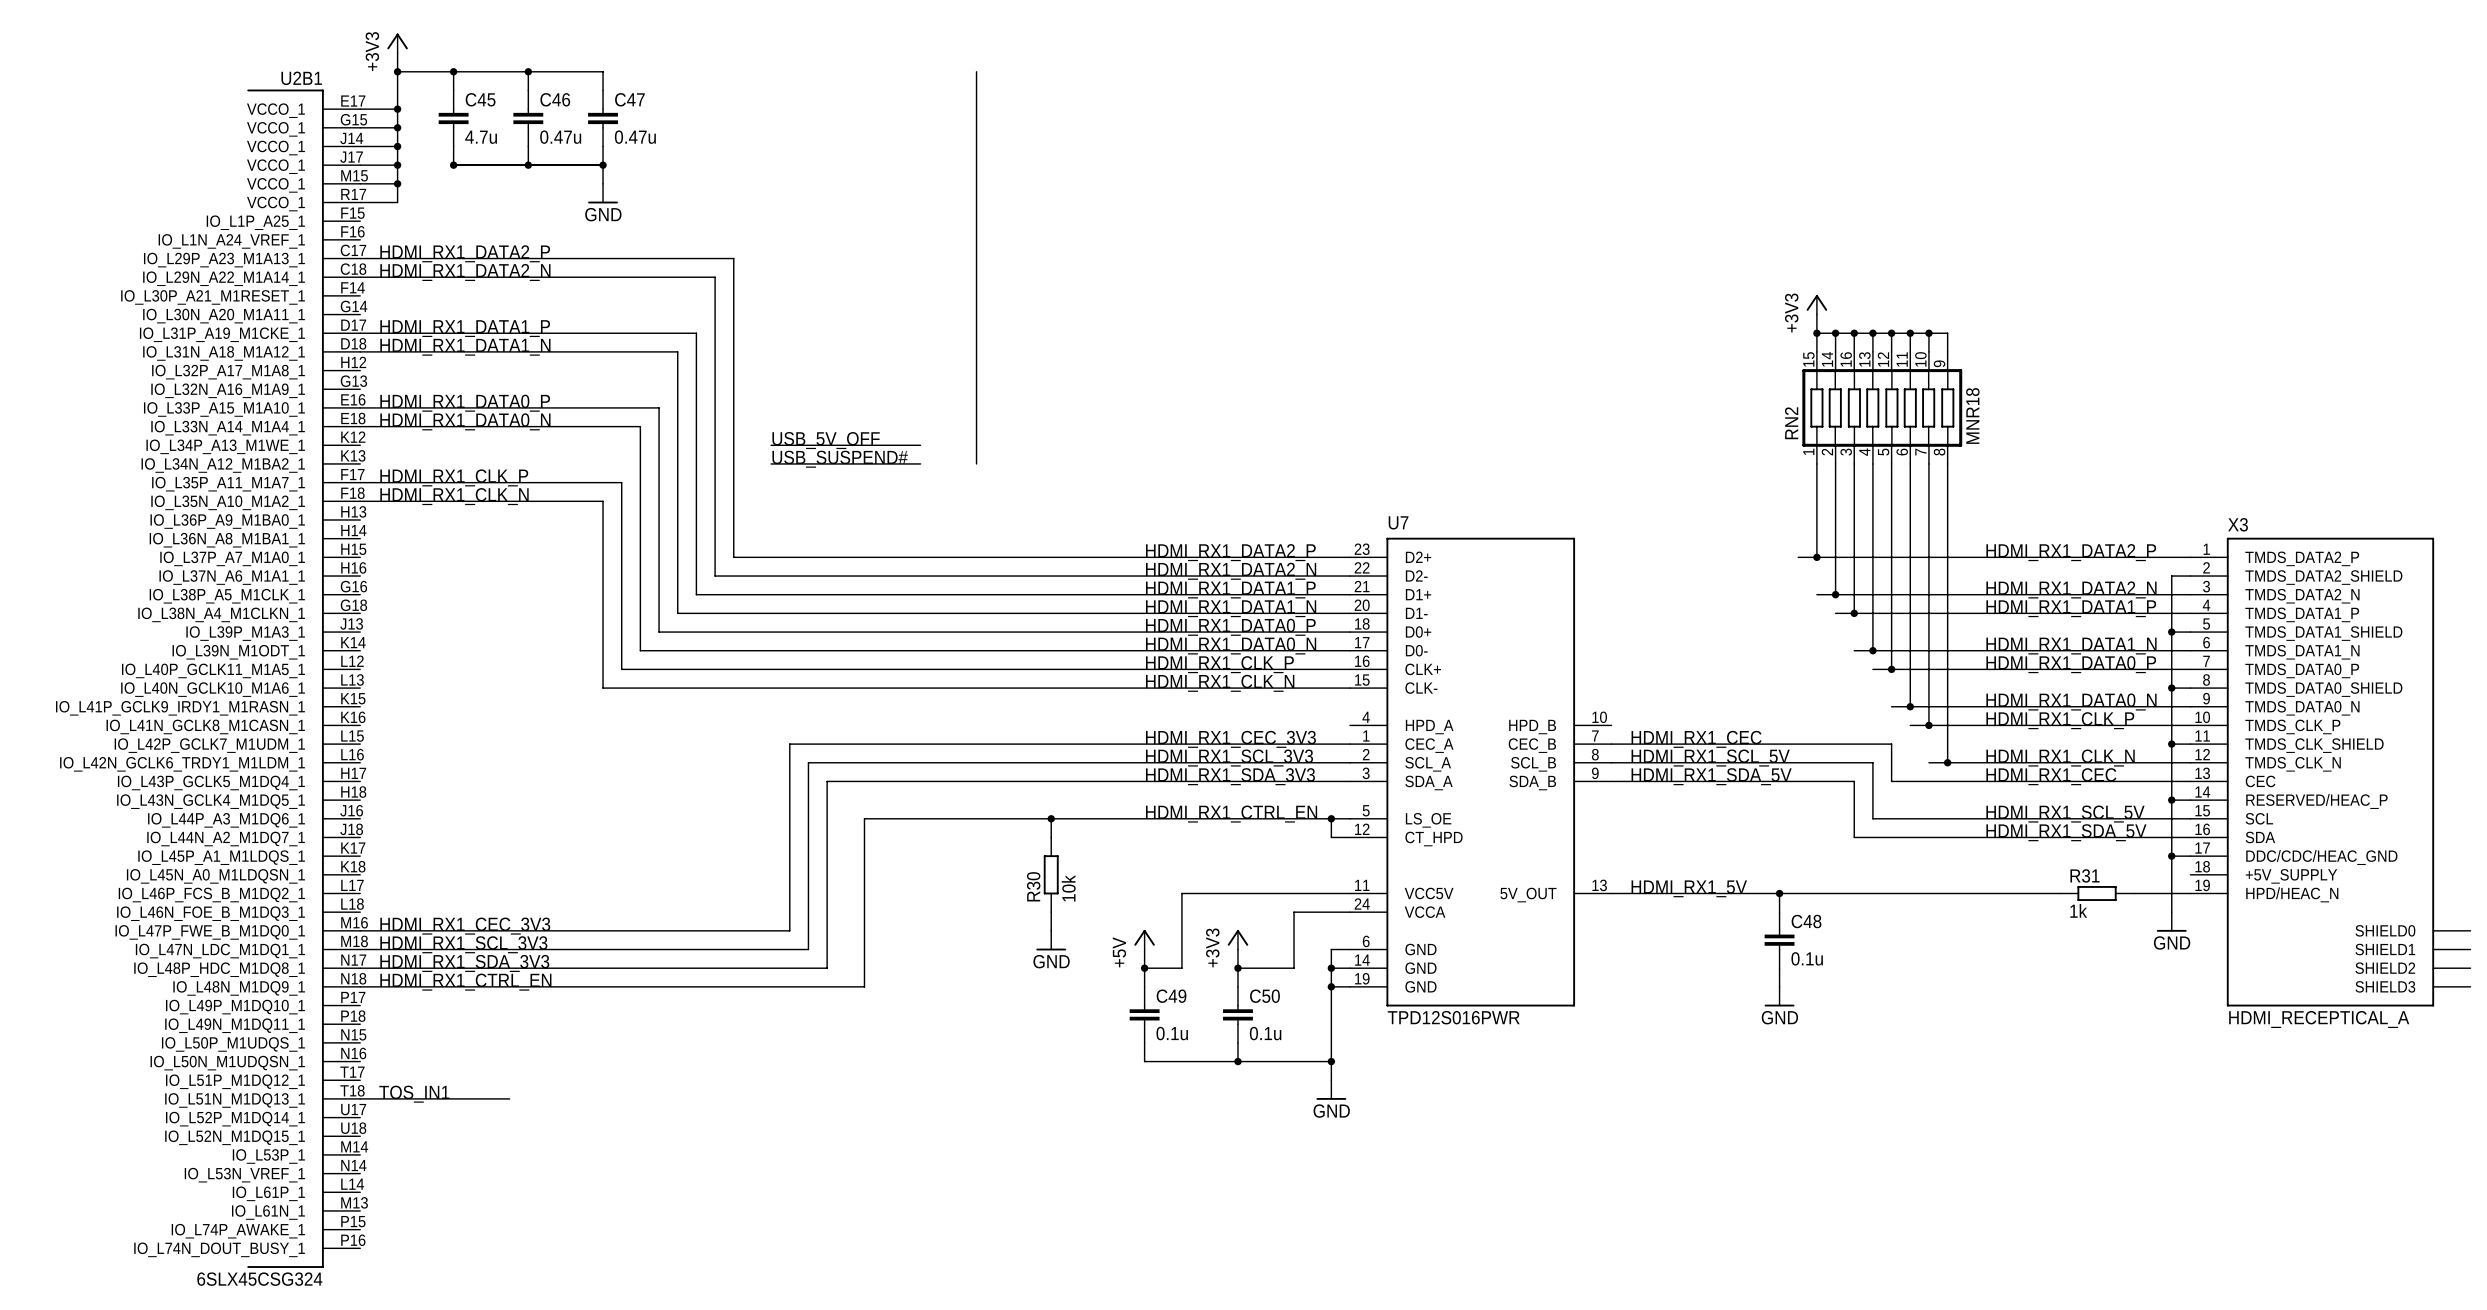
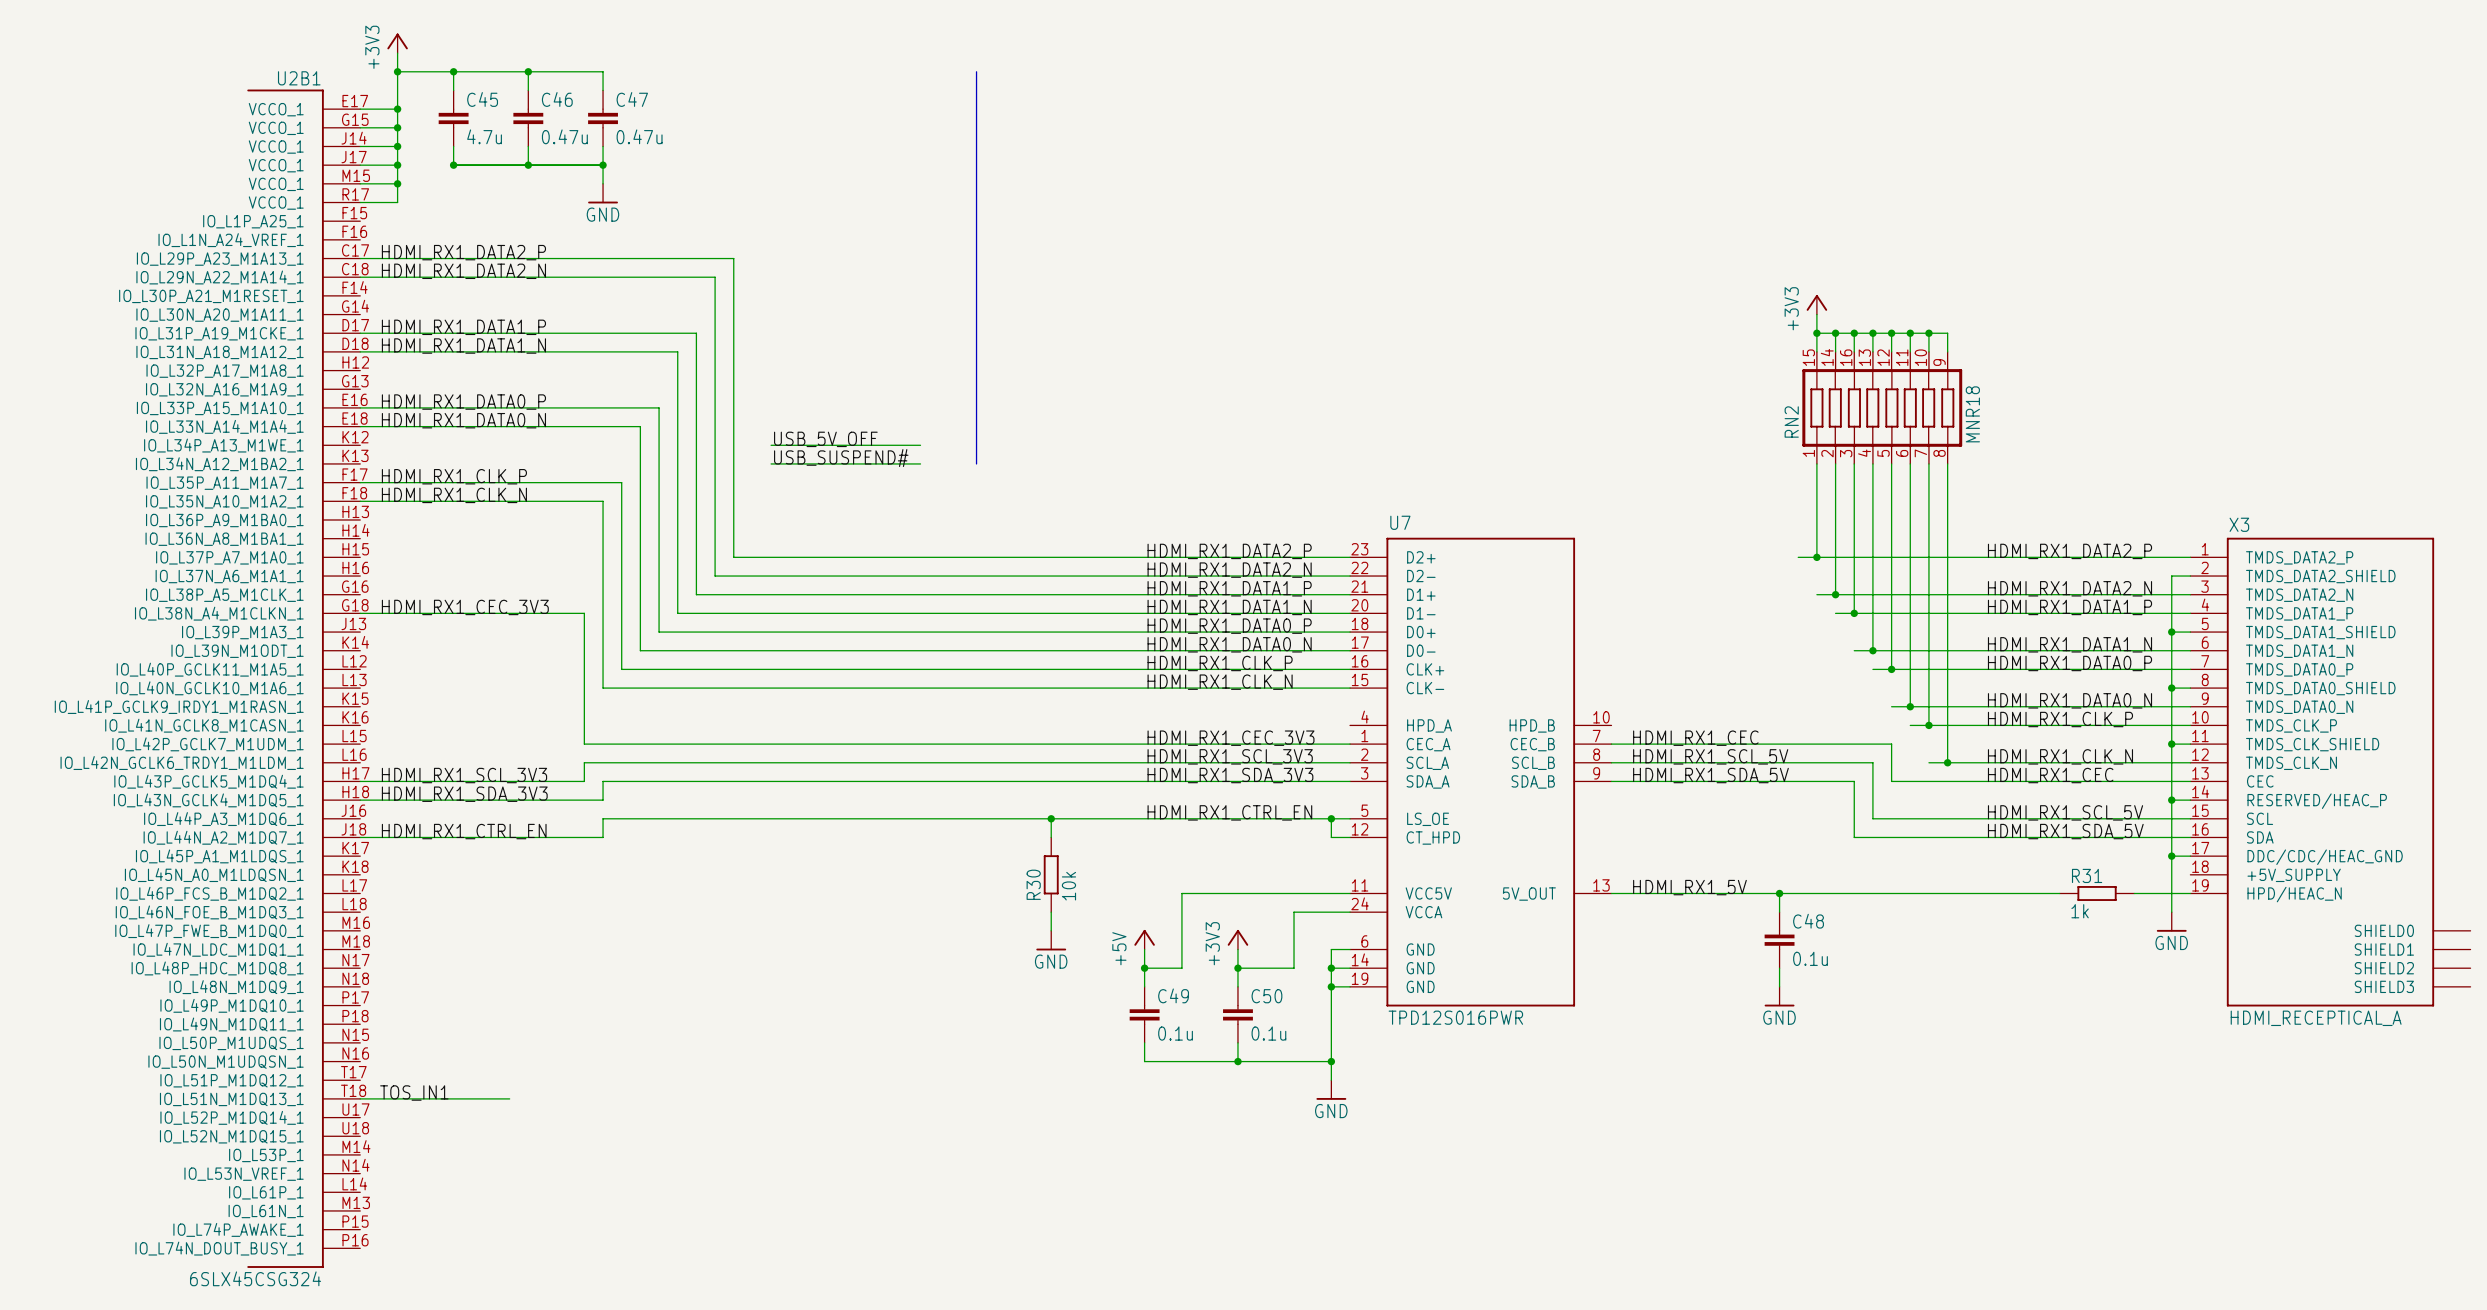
label: none -> HDMI_RX1_CEC_3V3 (465, 607)
wire: (789, 744) (789, 930) (360, 930) -> (789, 744) (584, 744) (584, 613) (360, 613)
wire: (808, 762) (808, 949) (360, 949) -> (808, 762) (584, 762) (584, 781) (360, 781)
wire: (827, 781) (827, 968) (360, 968) -> (827, 781) (603, 781) (603, 800) (360, 800)
wire: (864, 818) (864, 986) (360, 986) -> (864, 818) (603, 818) (603, 837) (360, 837)
label: HDMI_RX1_CEC_3V3 (465, 926) -> none
label position: HDMI_RX1_SCL_3V3 (463, 944) -> HDMI_RX1_SCL_3V3 (464, 775)
label position: HDMI_RX1_SDA_3V3 (464, 963) -> HDMI_RX1_SDA_3V3 (464, 794)
label position: HDMI_RX1_CTRL_EN (465, 982) -> HDMI_RX1_CTRL_EN (464, 831)

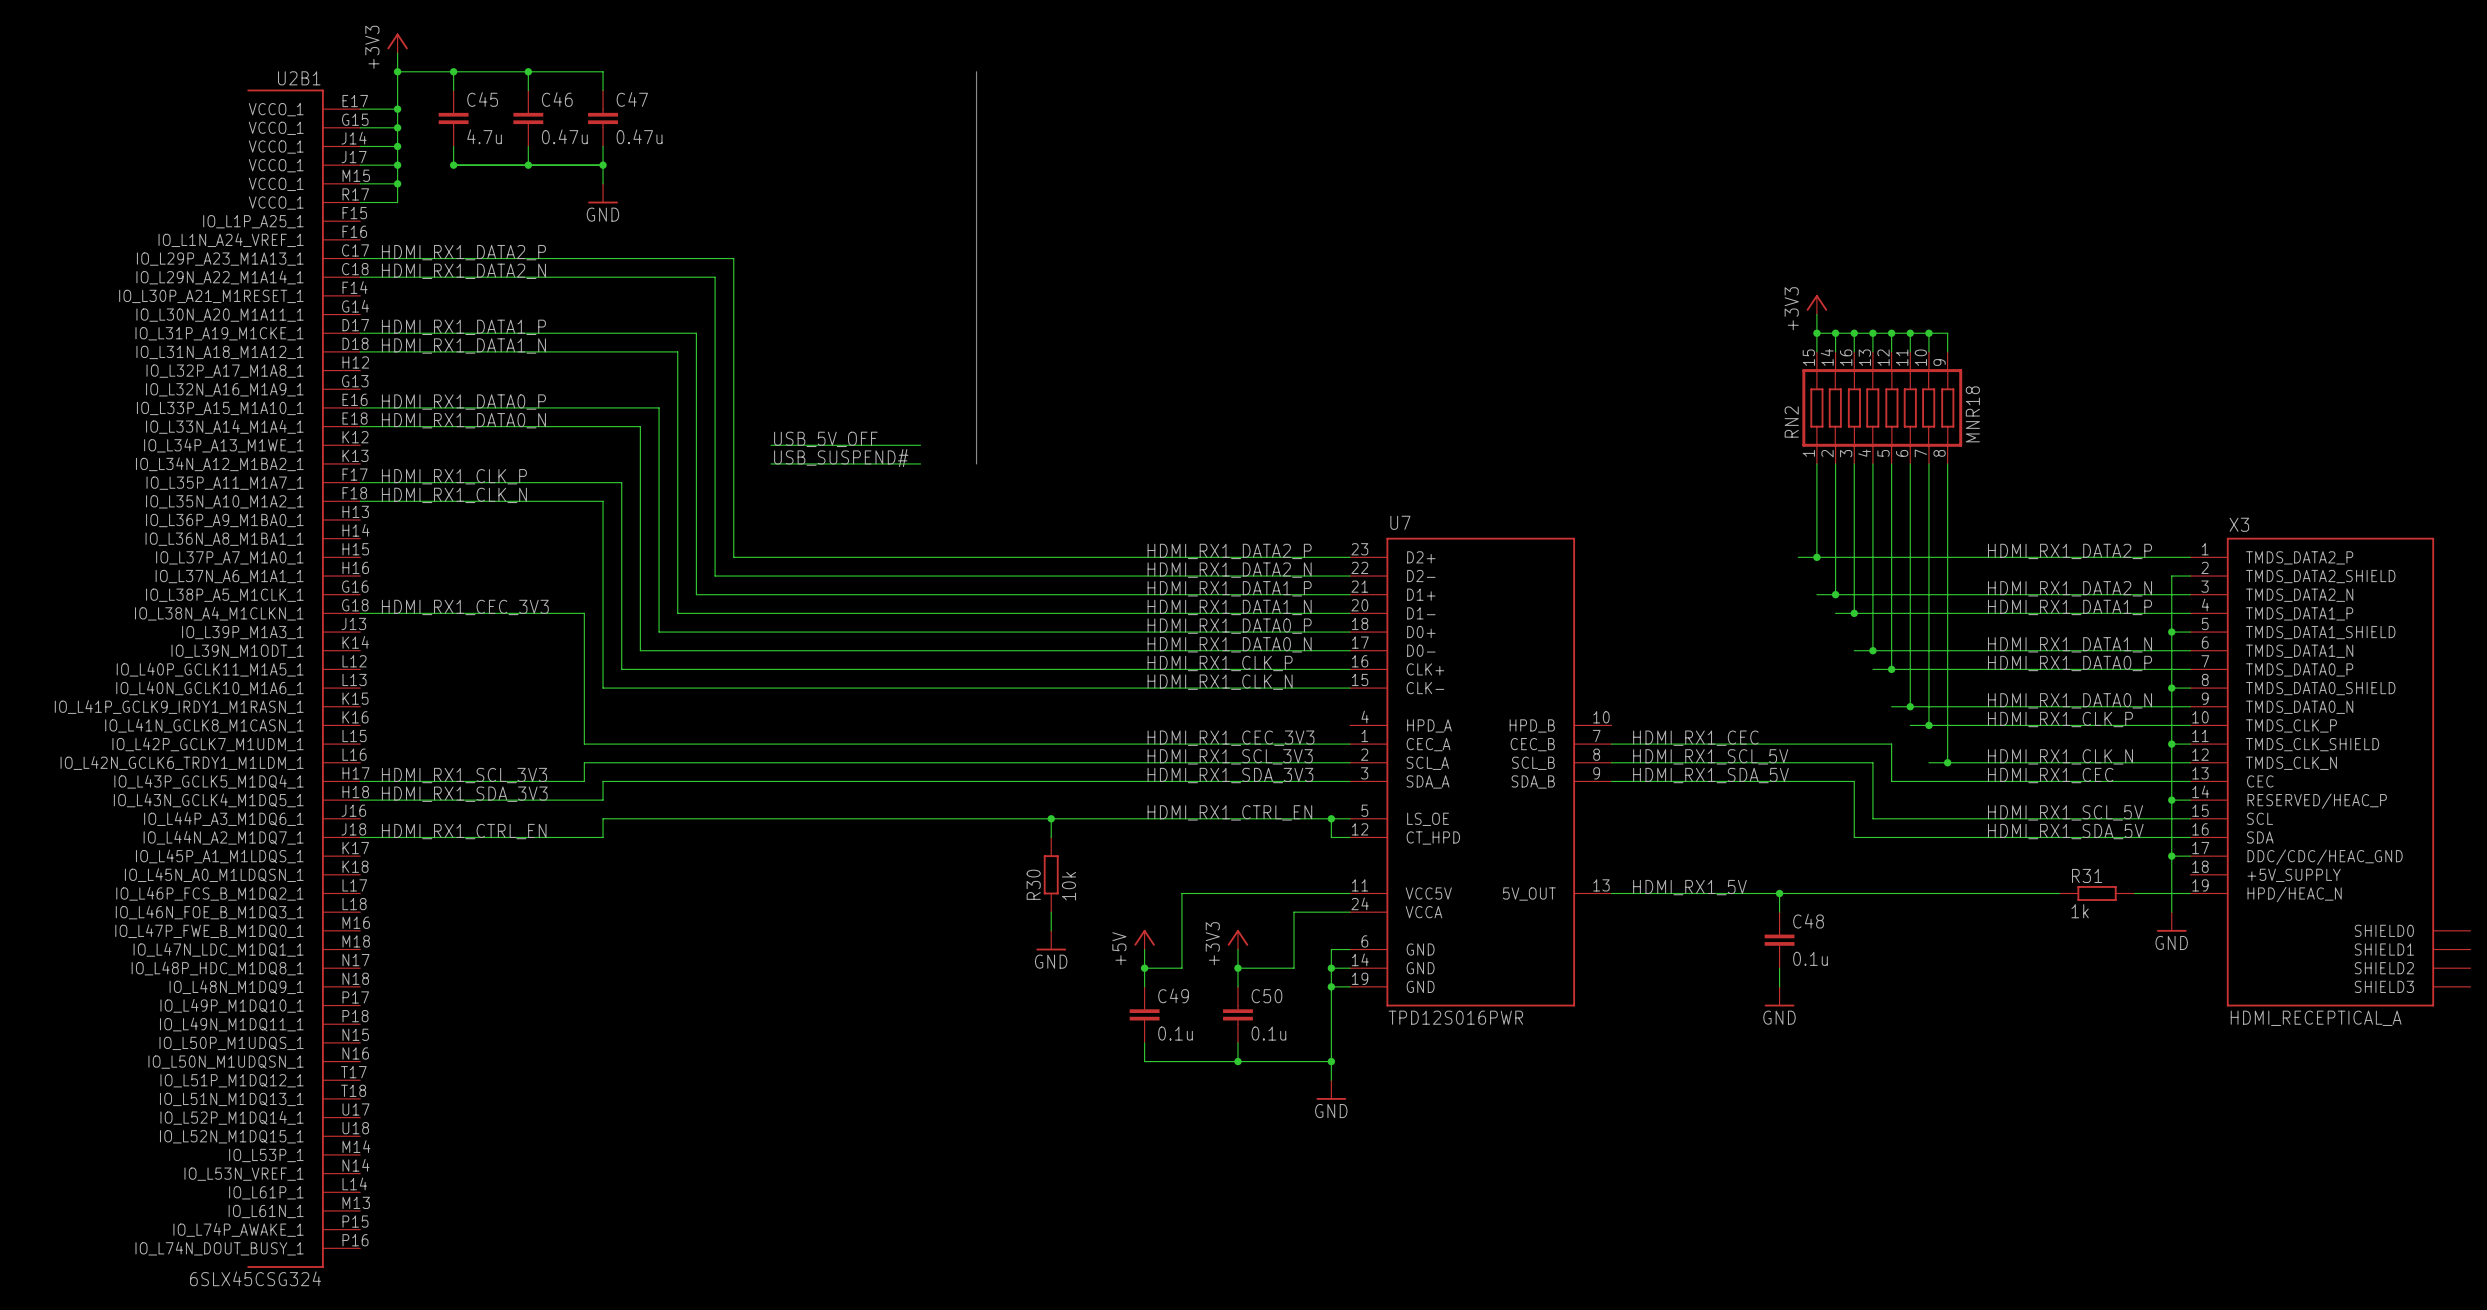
label: TOS_IN1 (414, 1093) -> none
wire: (360, 1098) (509, 1098) -> none

